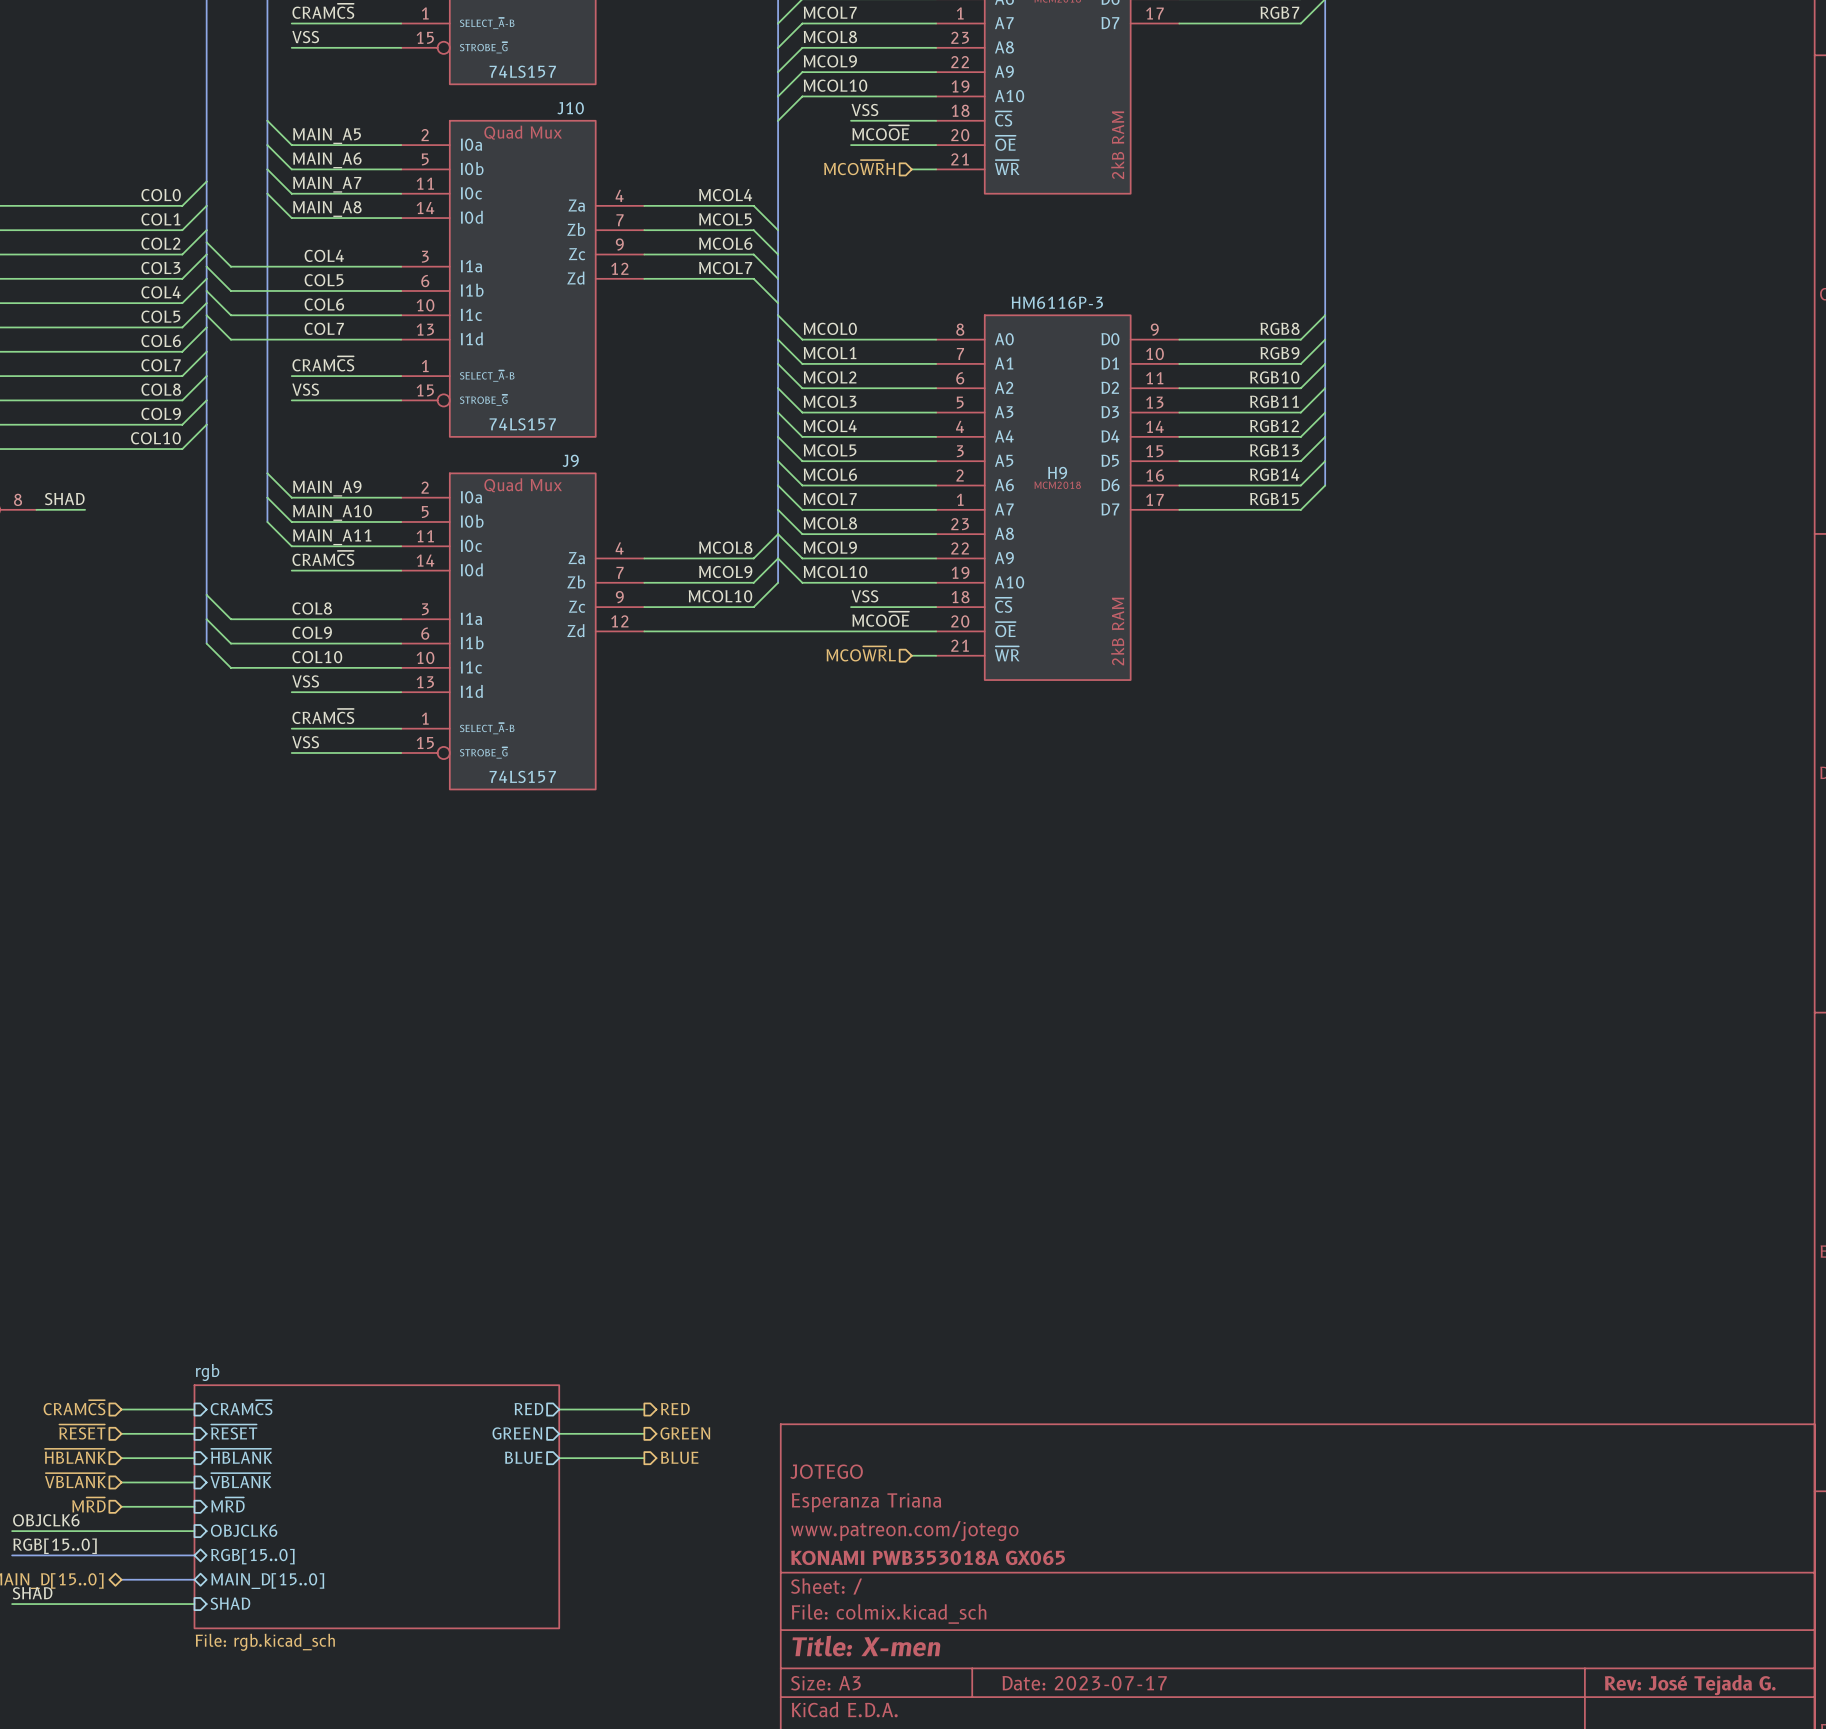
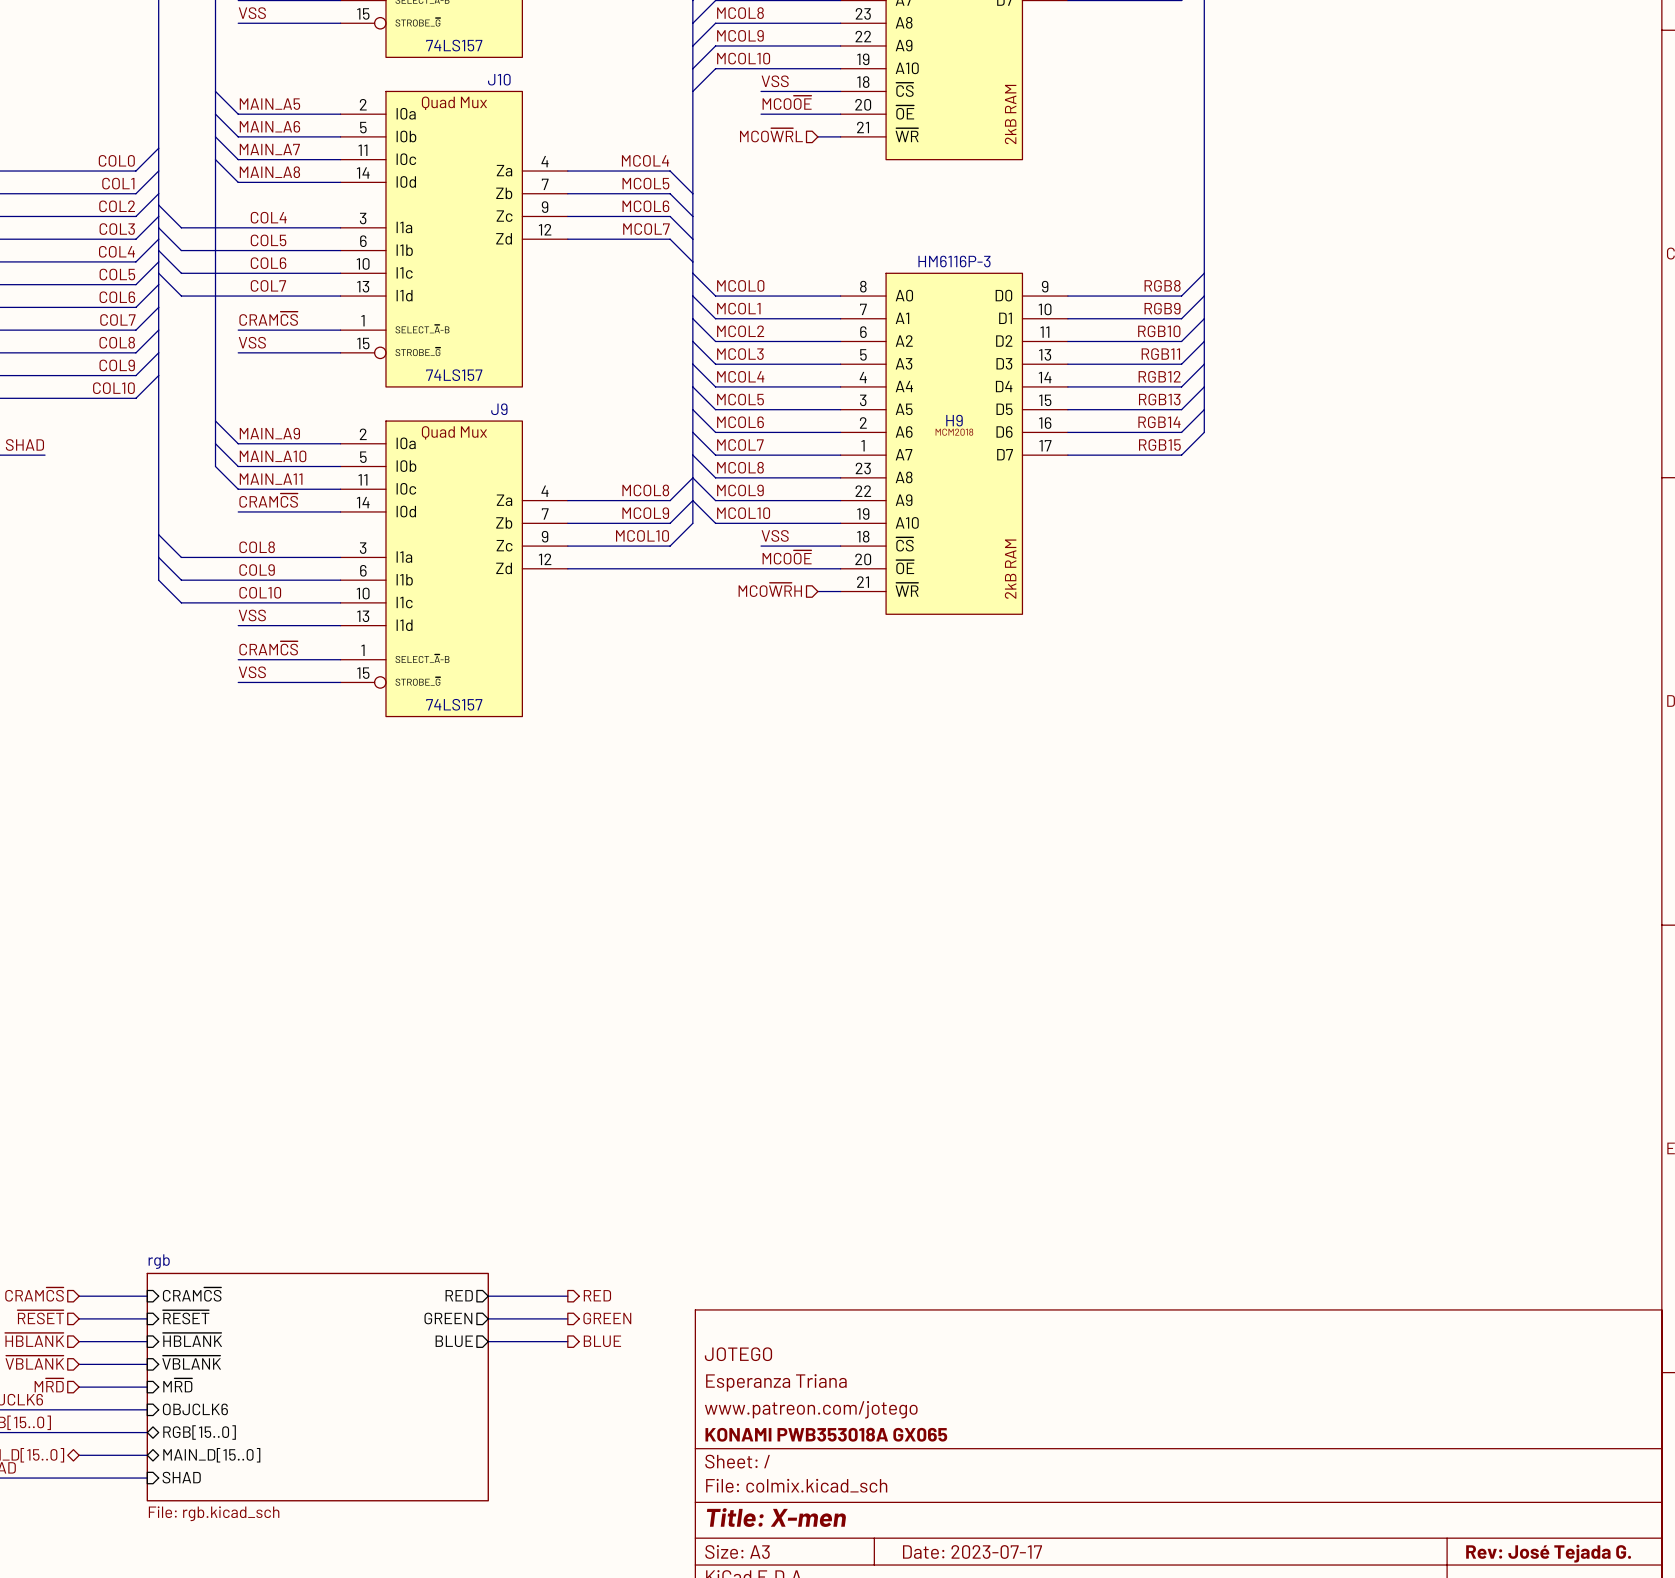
hierarchical label: MCO~{WR}H (859, 167) -> MCO~{WR}L (771, 135)
hierarchical label: MCO~{WR}L (861, 653) -> MCO~{WR}H (770, 589)

